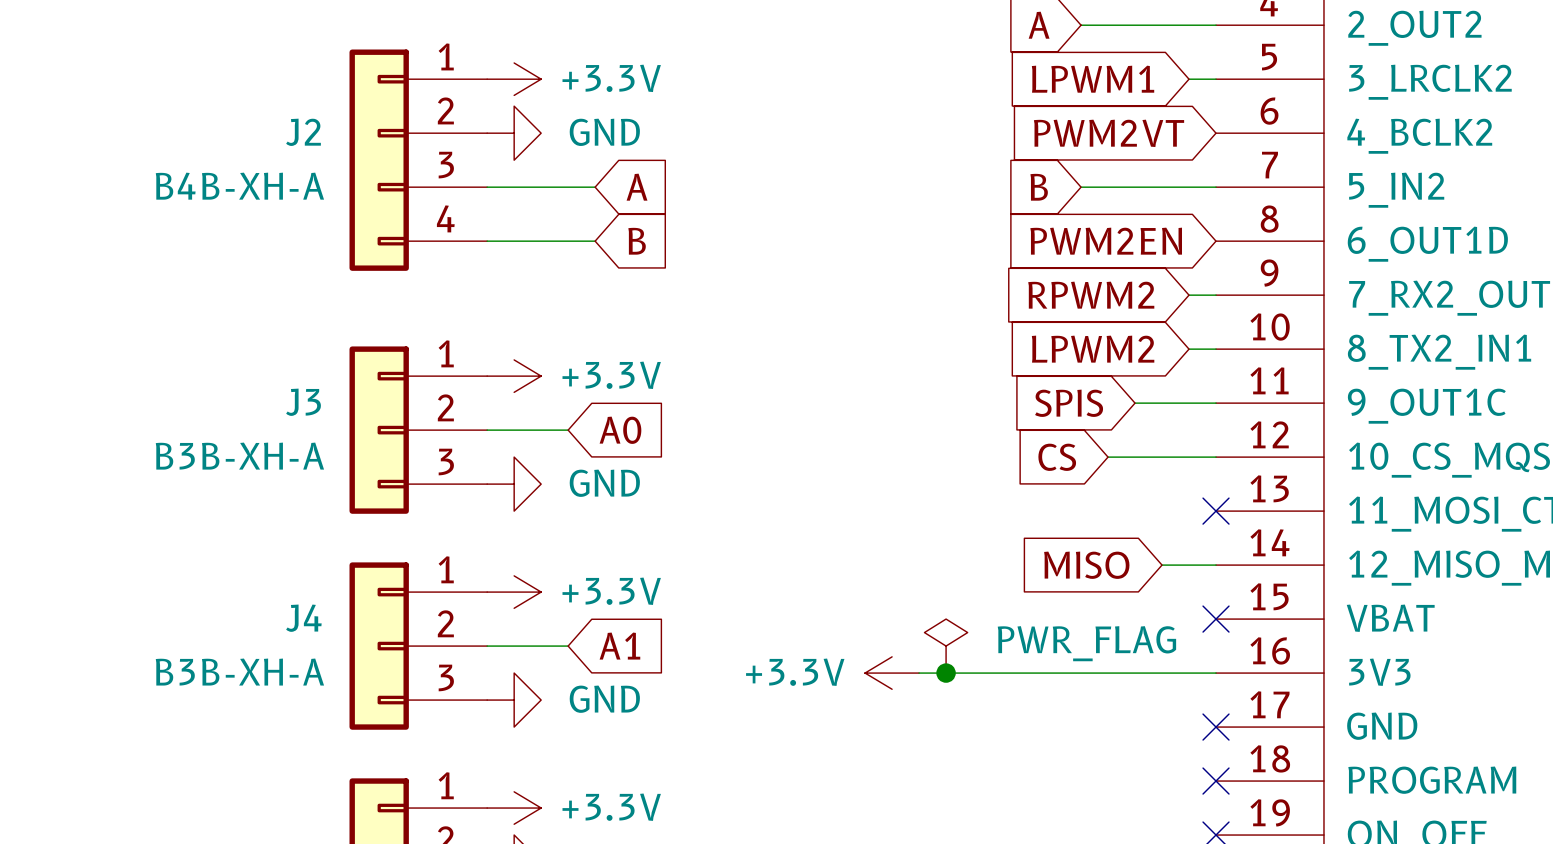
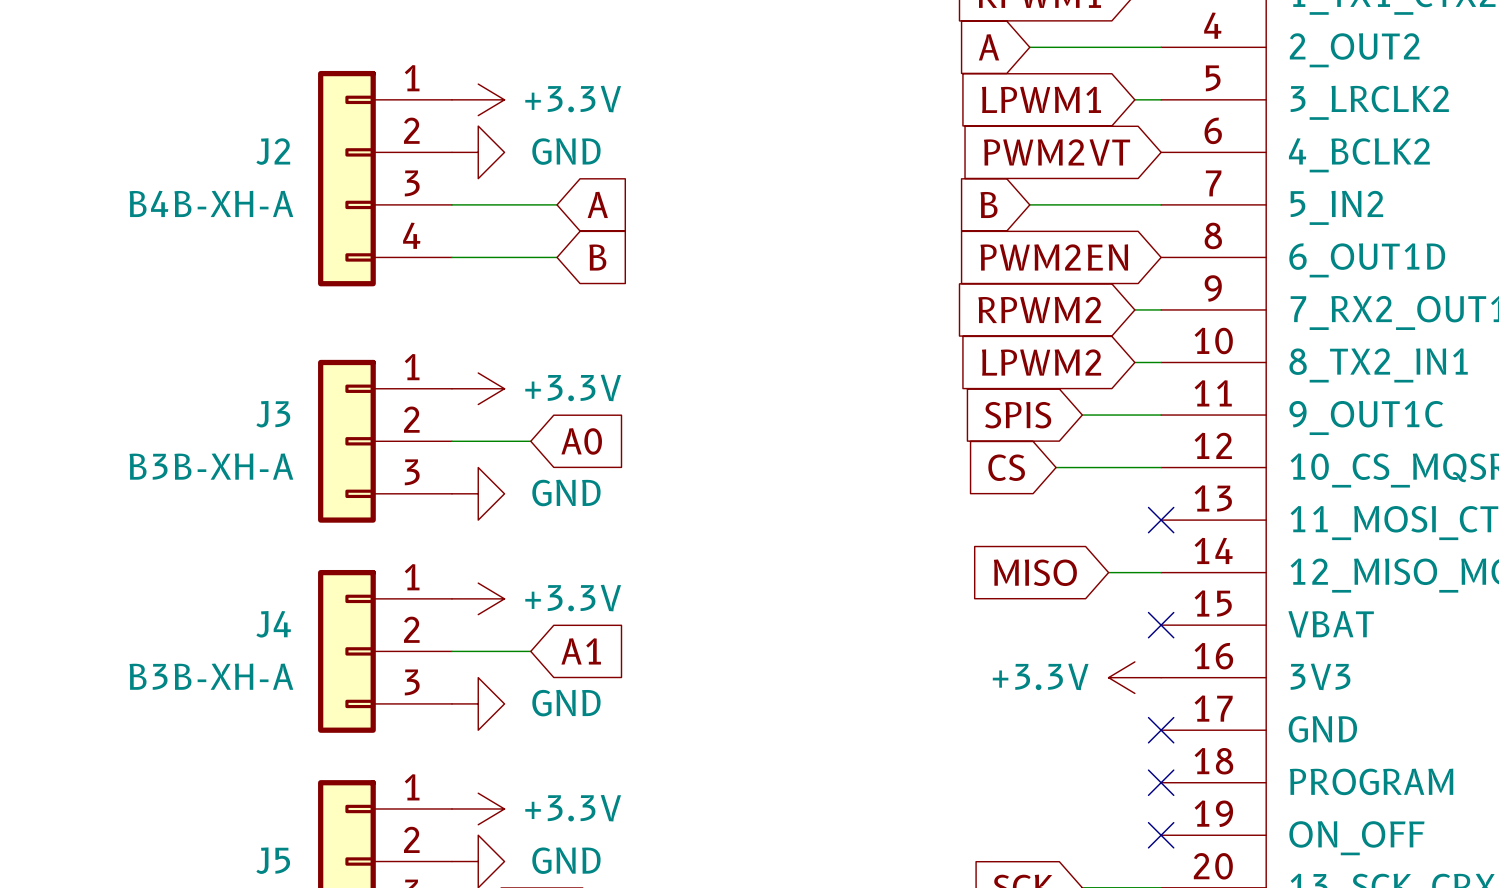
power symbol: PWR_FLAG (946, 646) -> none
power symbol position: +3.3V (892, 673) -> +3.3V (1134, 677)
wire: (919, 673) (1216, 673) -> none
junction: (946, 673) -> none

